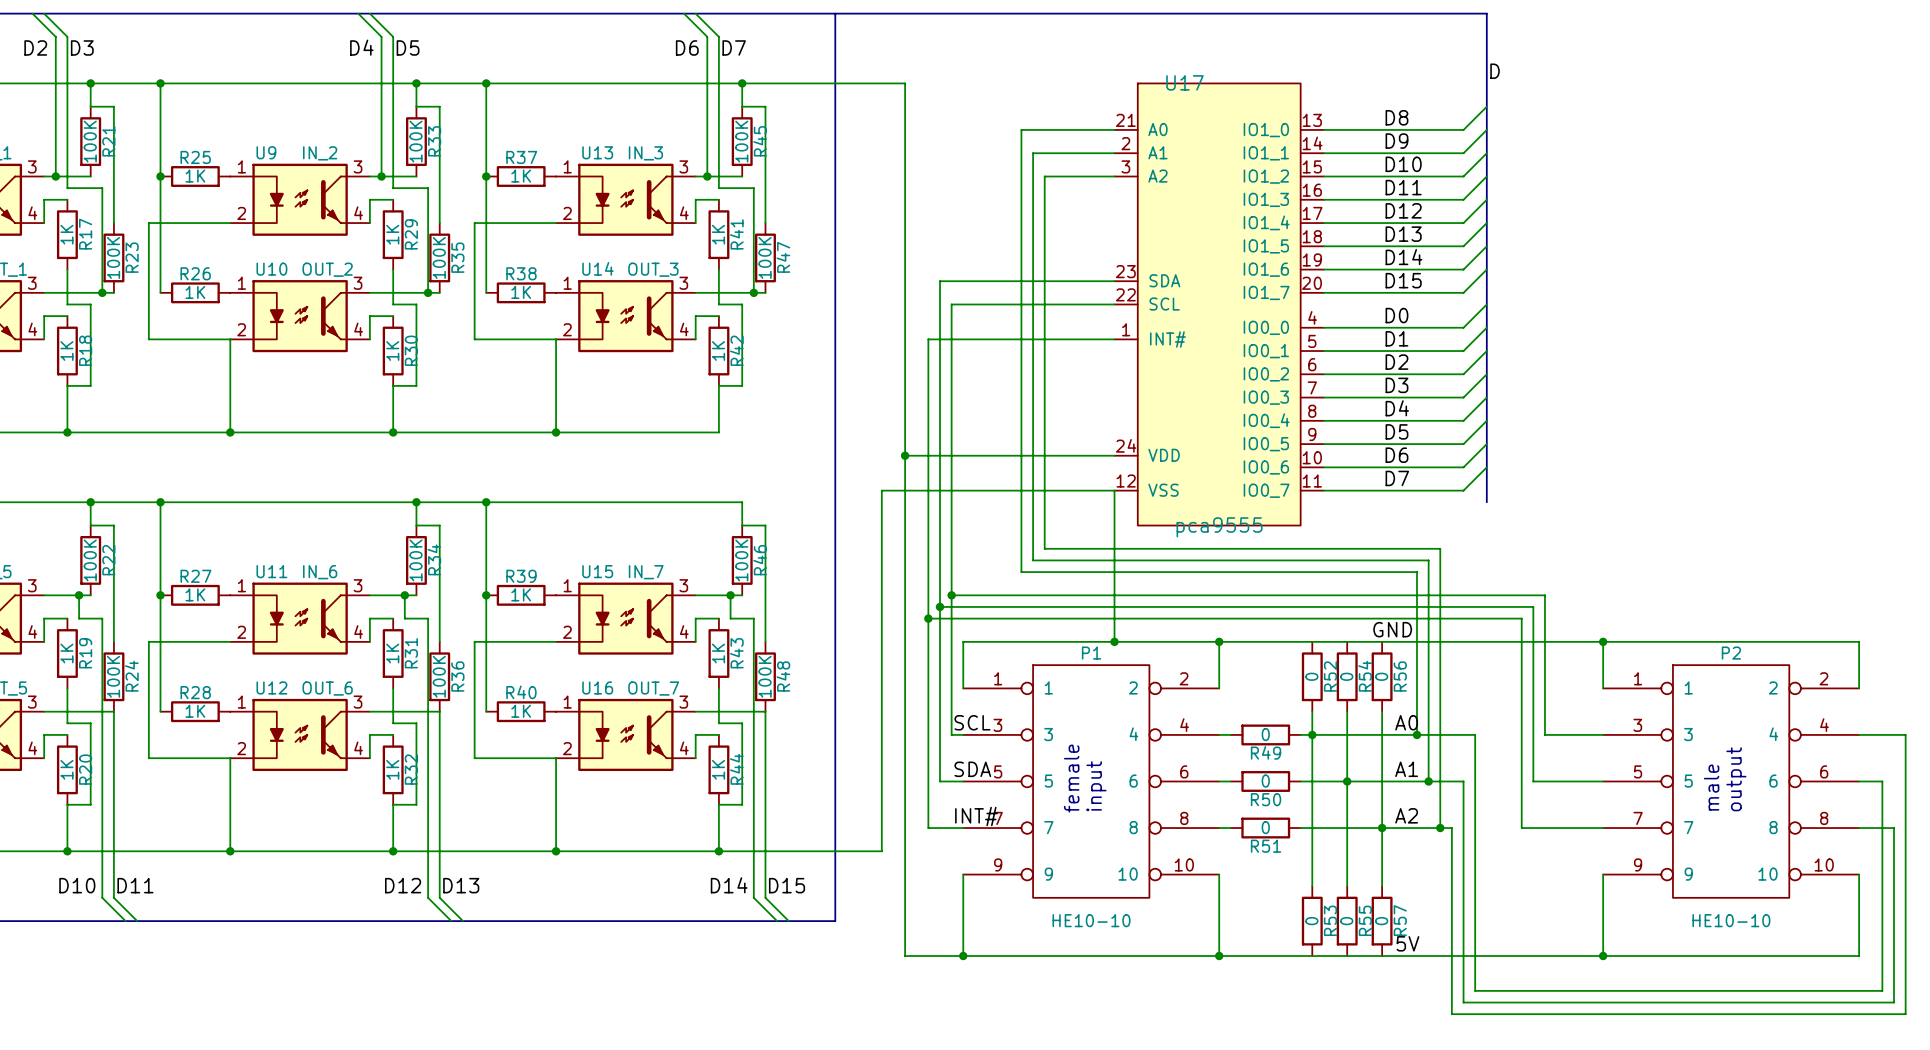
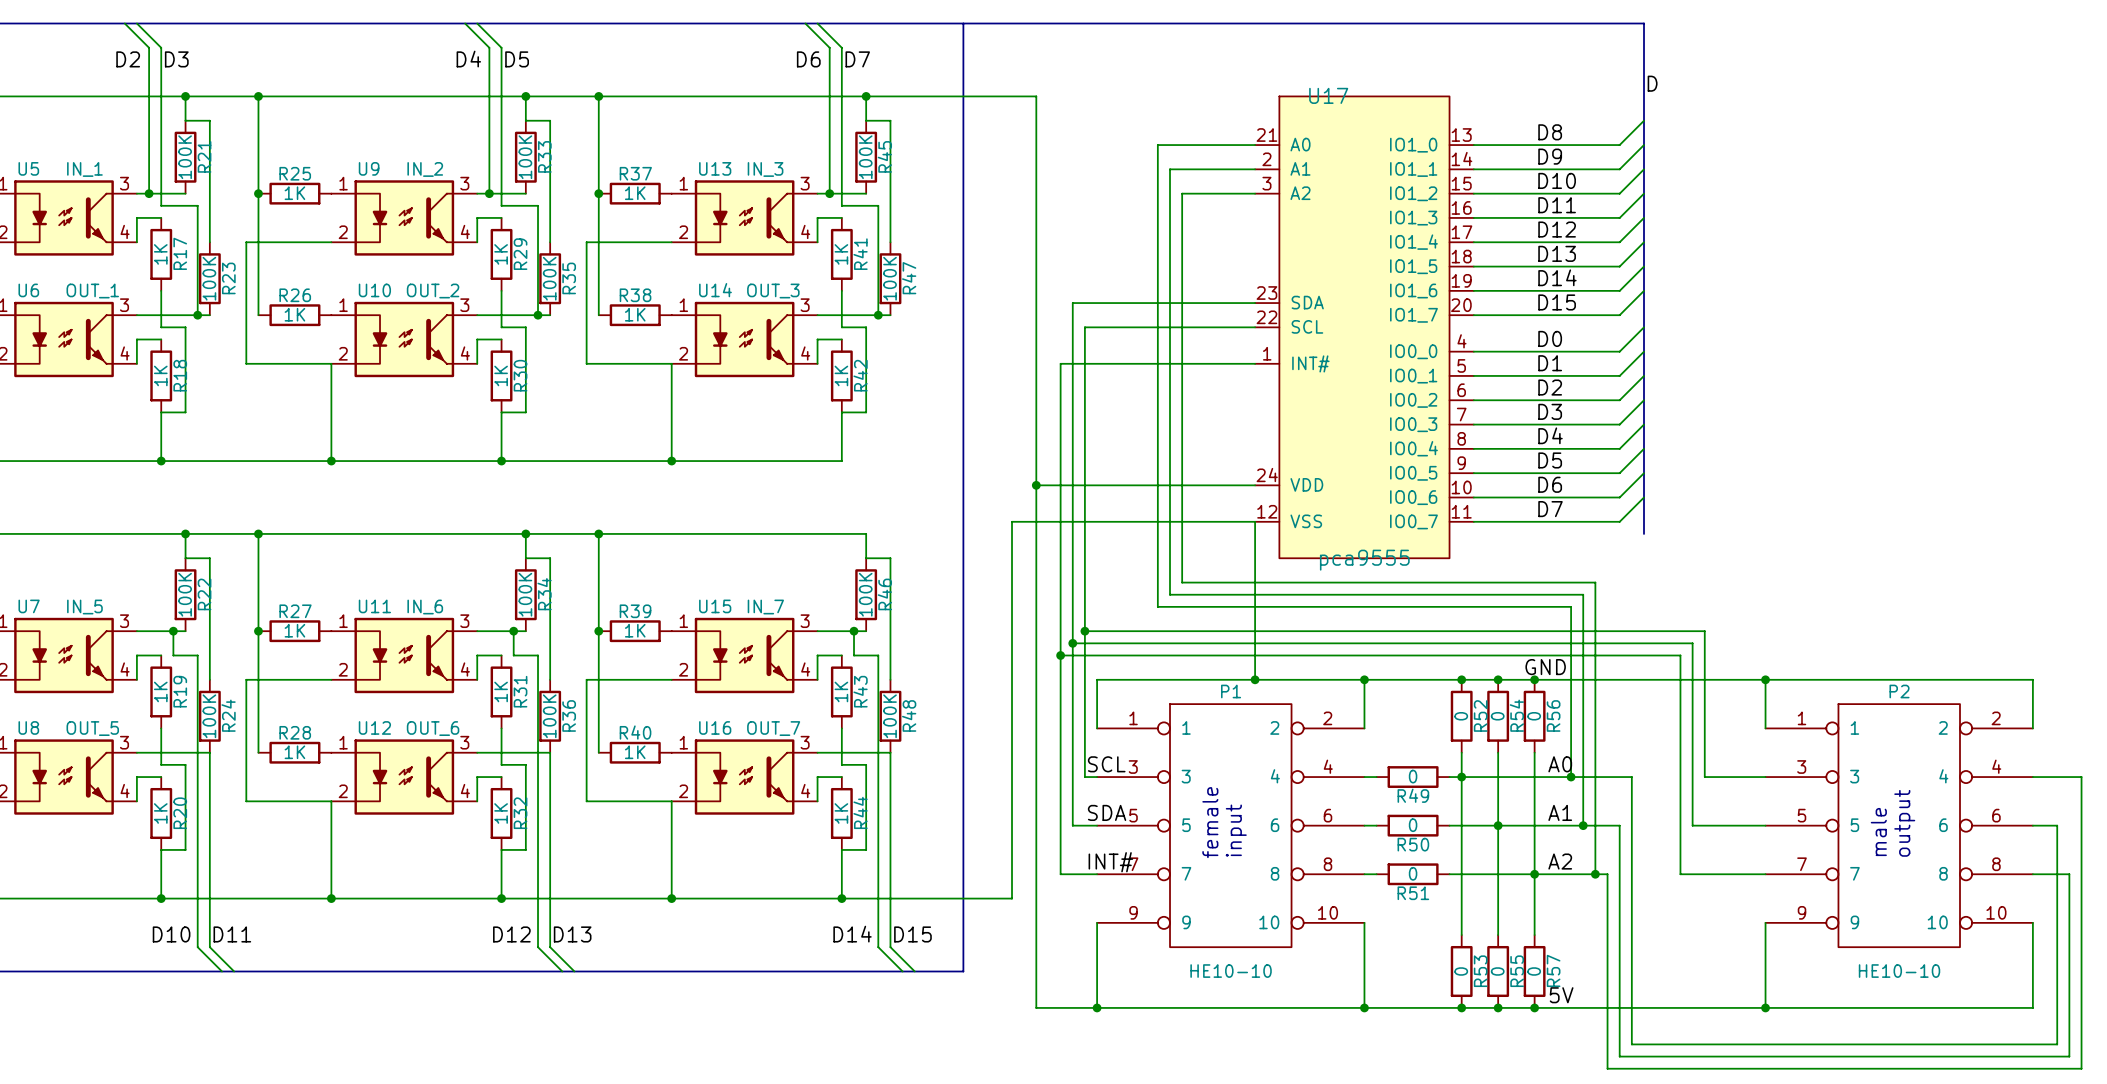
junction: none -> (1461, 679)
junction: none -> (1498, 679)
junction: none -> (1534, 679)
junction: none -> (1461, 1007)
junction: none -> (1498, 1007)
junction: none -> (1534, 1007)

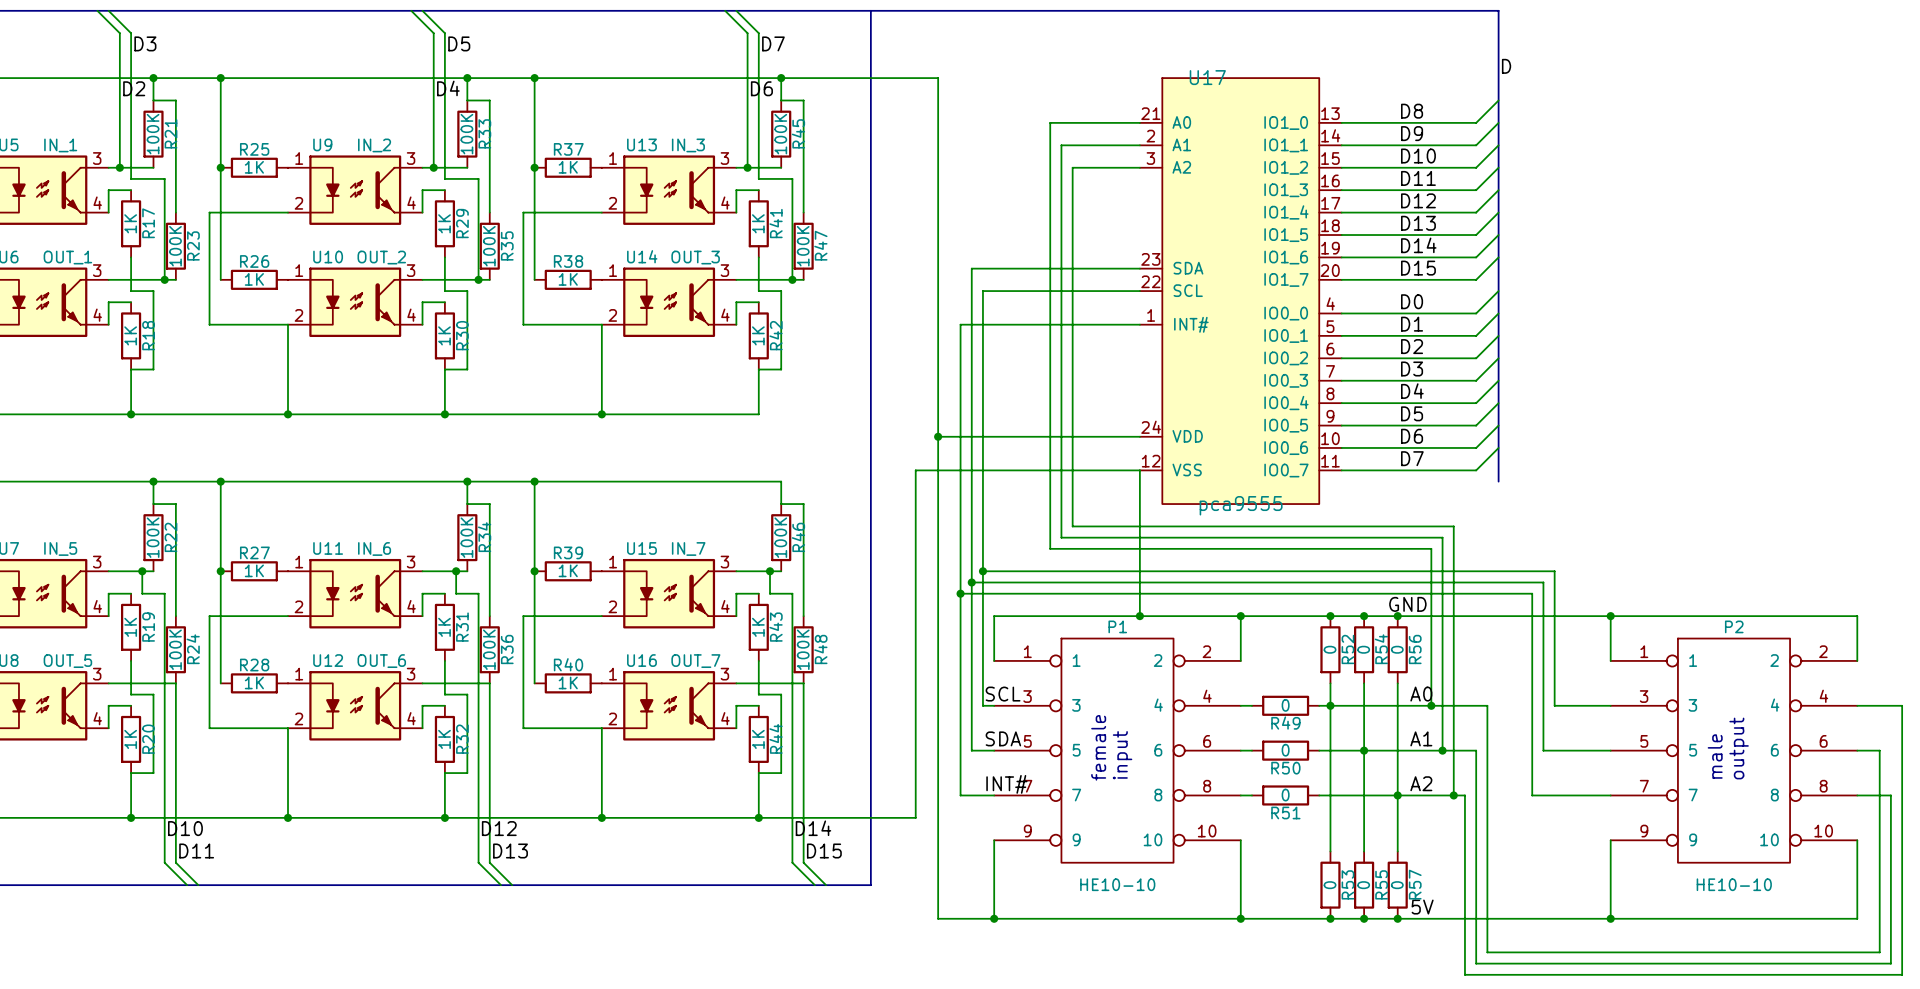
label position: D2 (128, 59) -> D2 (134, 88)
label position: D4 (468, 59) -> D4 (448, 88)
label position: D6 (808, 59) -> D6 (761, 88)
label position: D10 (171, 934) -> D10 (185, 828)
label position: D12 (511, 934) -> D12 (499, 828)
label position: D14 (852, 934) -> D14 (813, 828)

